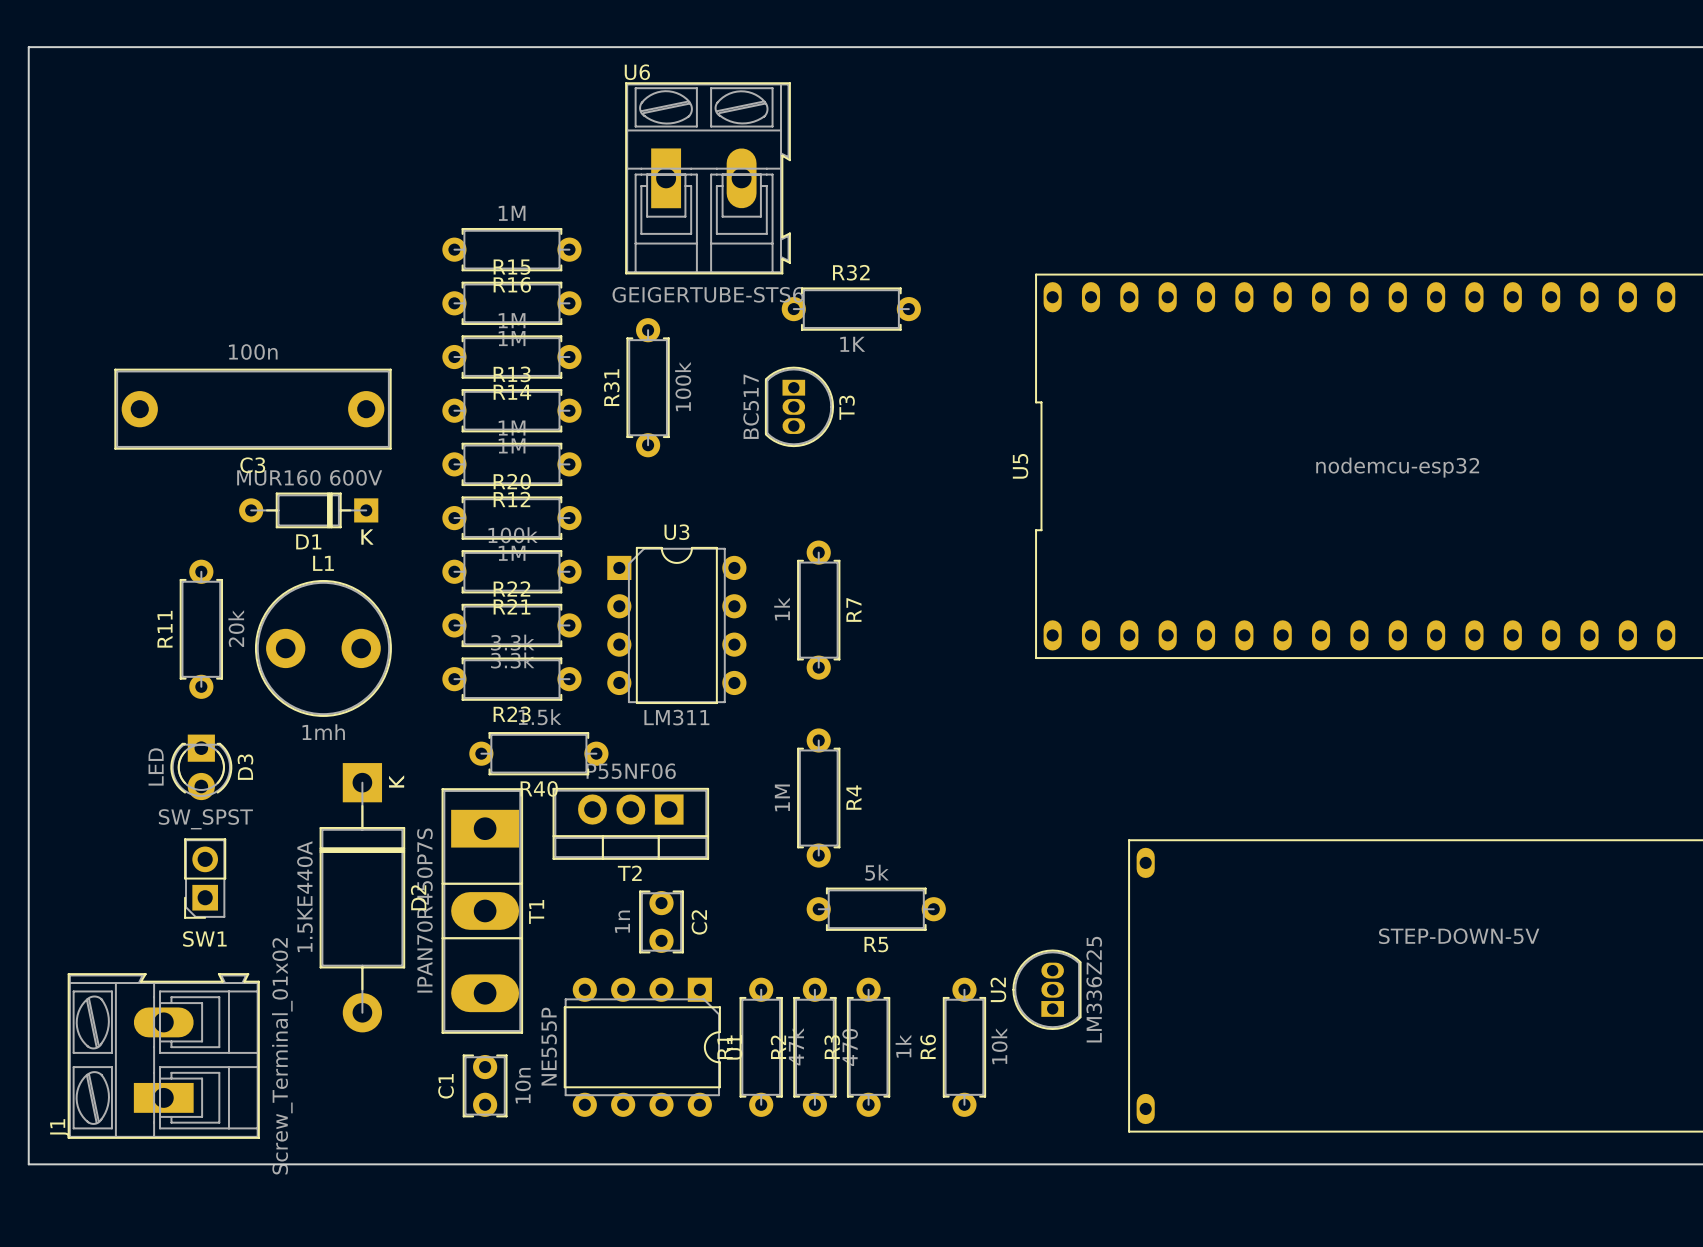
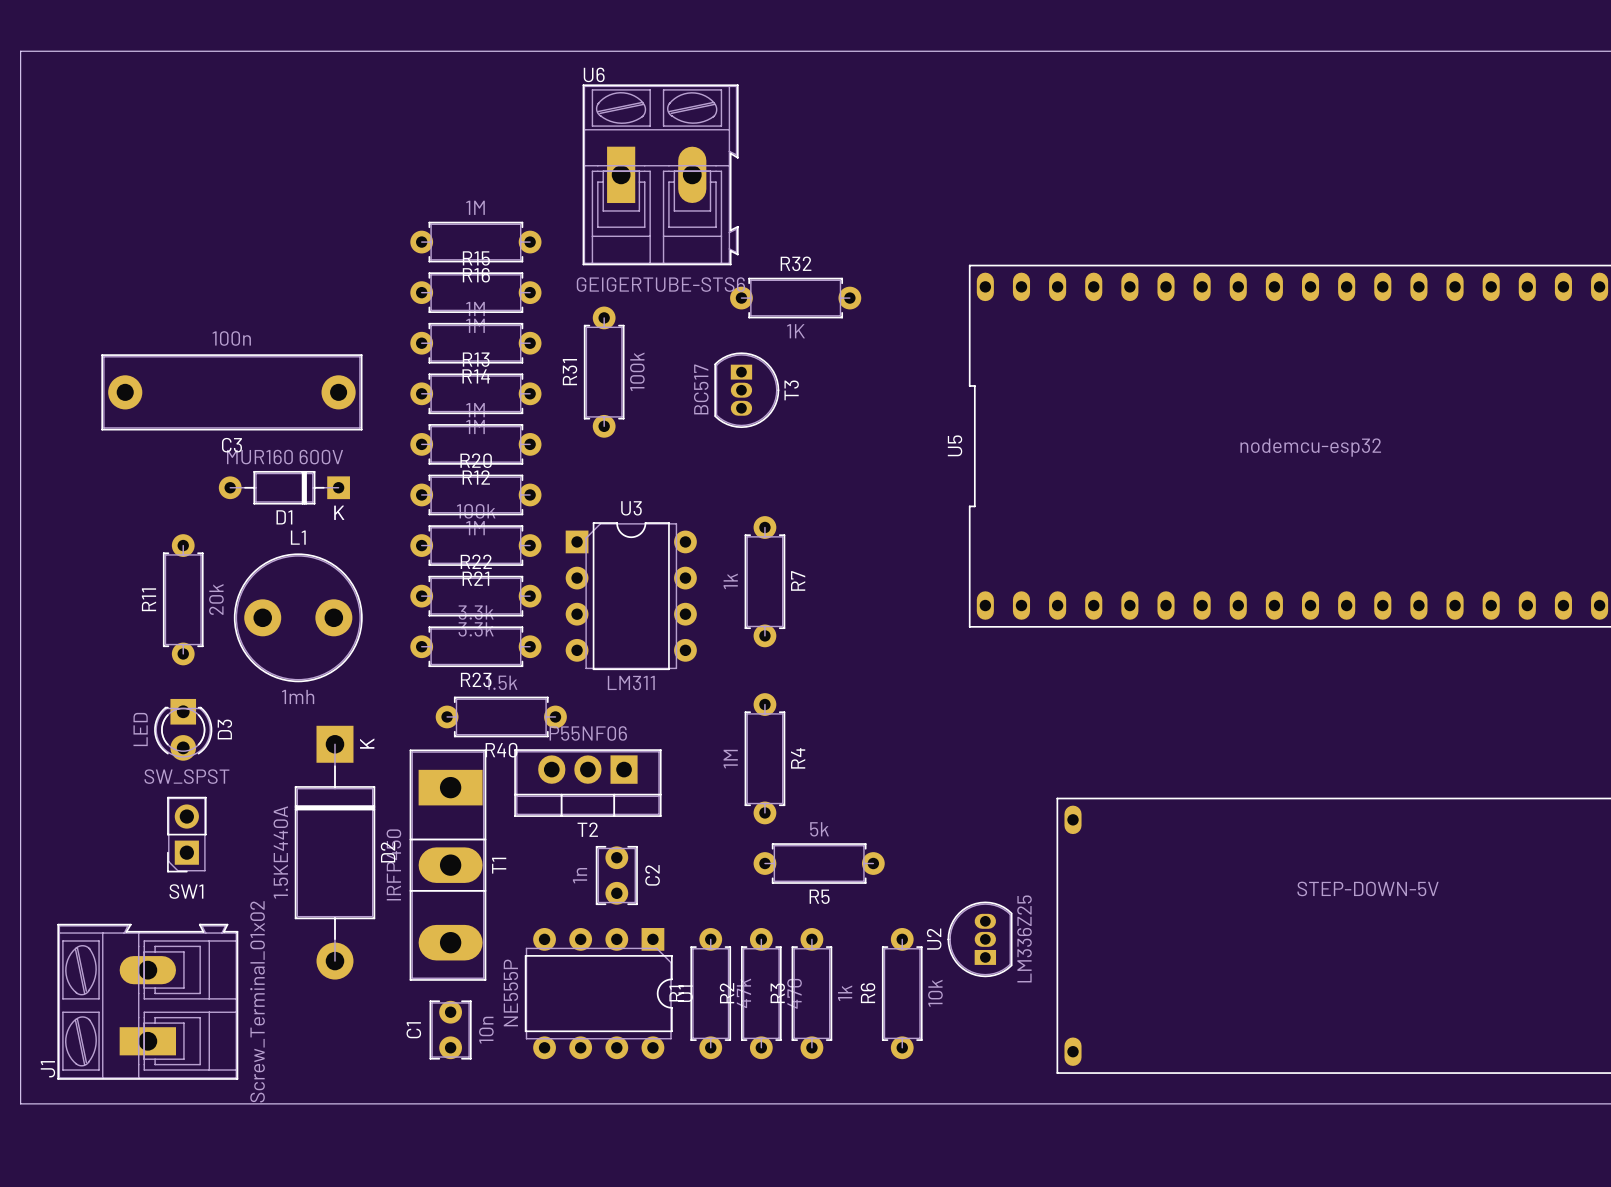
T1 value: IPAN70R450P7S (424, 910) -> IRFP450 (393, 864)

